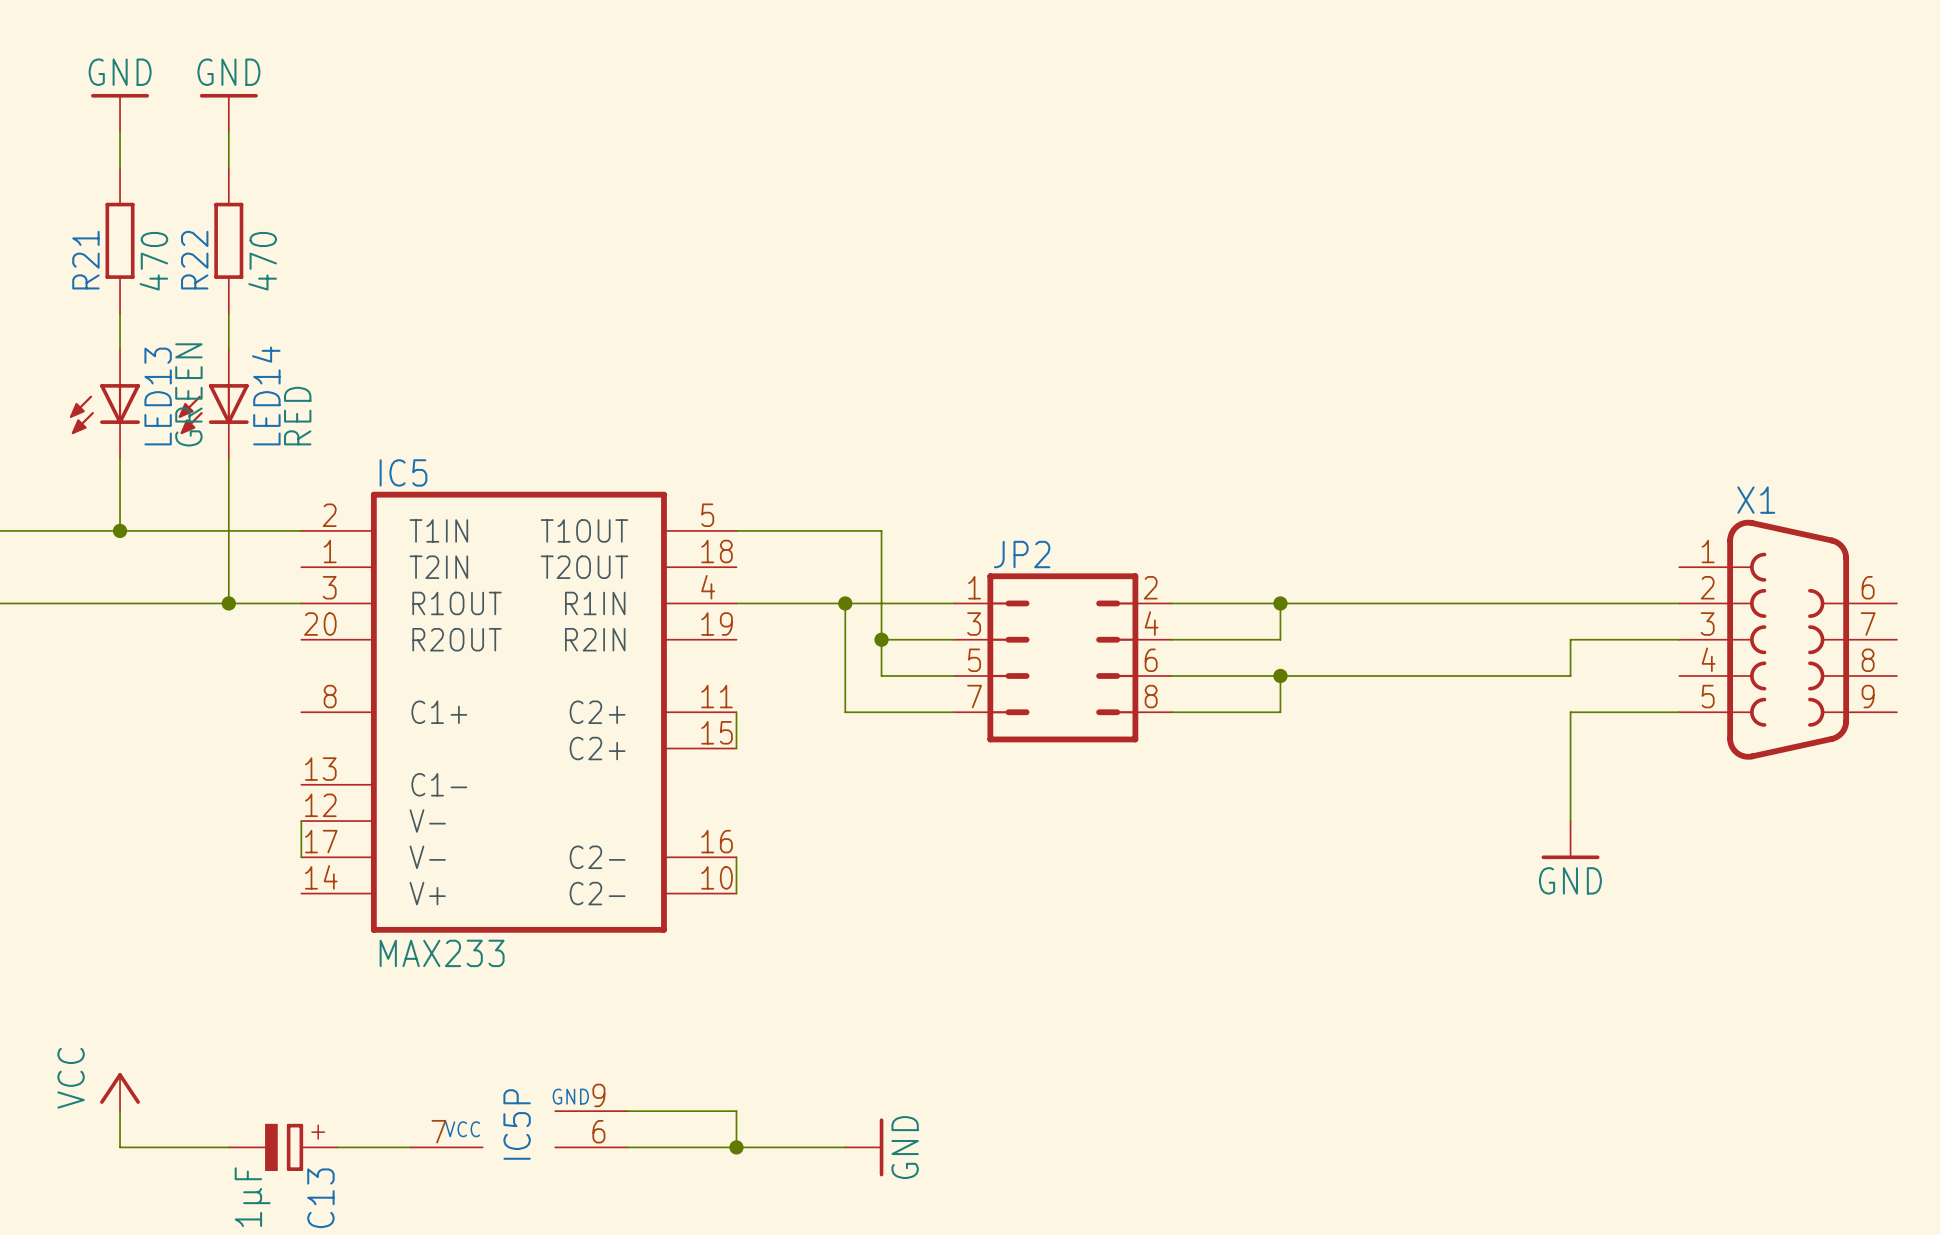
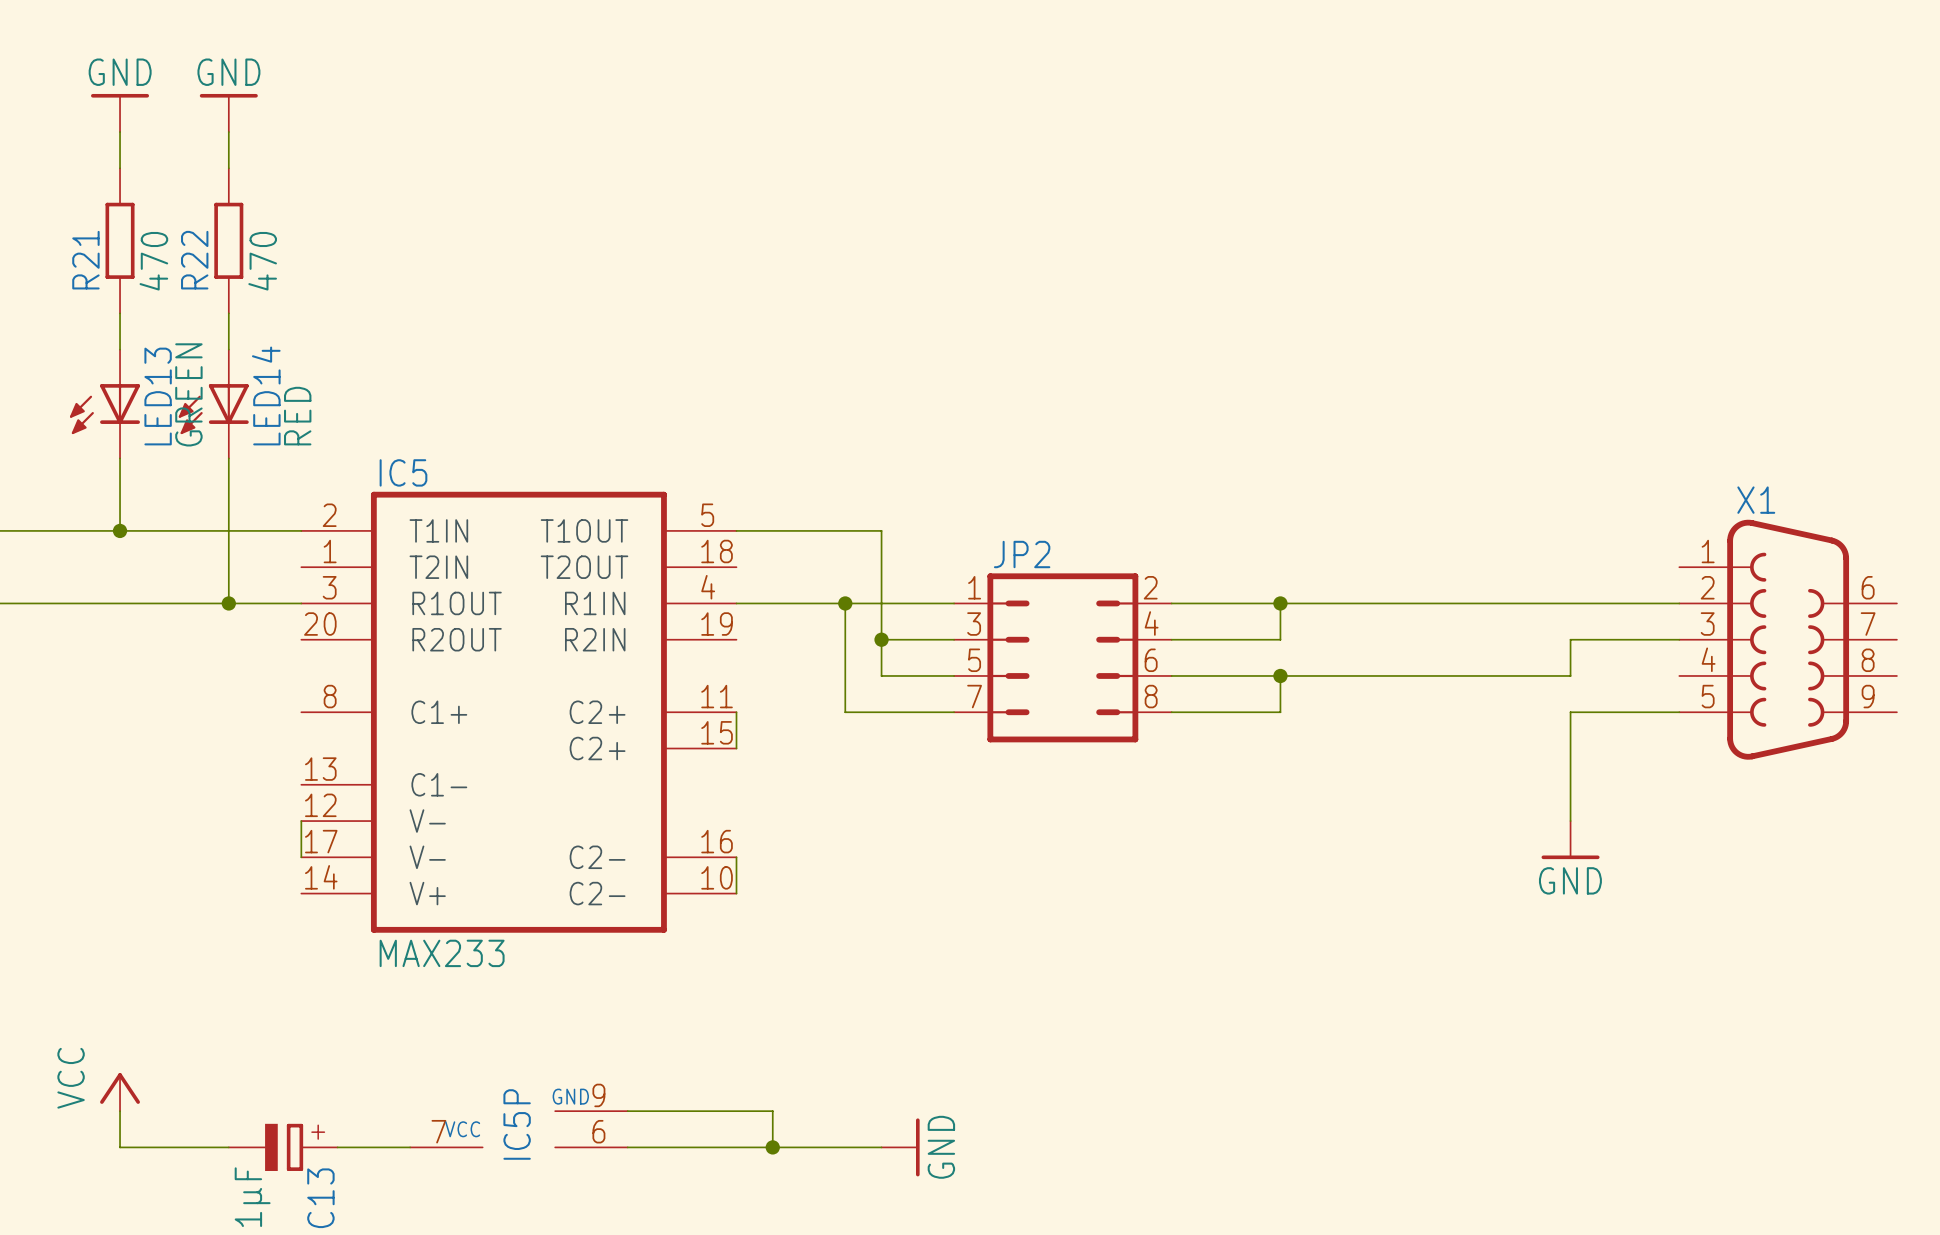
wire: (736, 1111) (736, 1147) -> (736, 1111) (772, 1111) (772, 1147)
junction position: (736, 1147) -> (772, 1147)
power symbol position: GND (864, 1147) -> GND (900, 1147)
power symbol text position: GND (905, 1147) -> GND (941, 1147)

